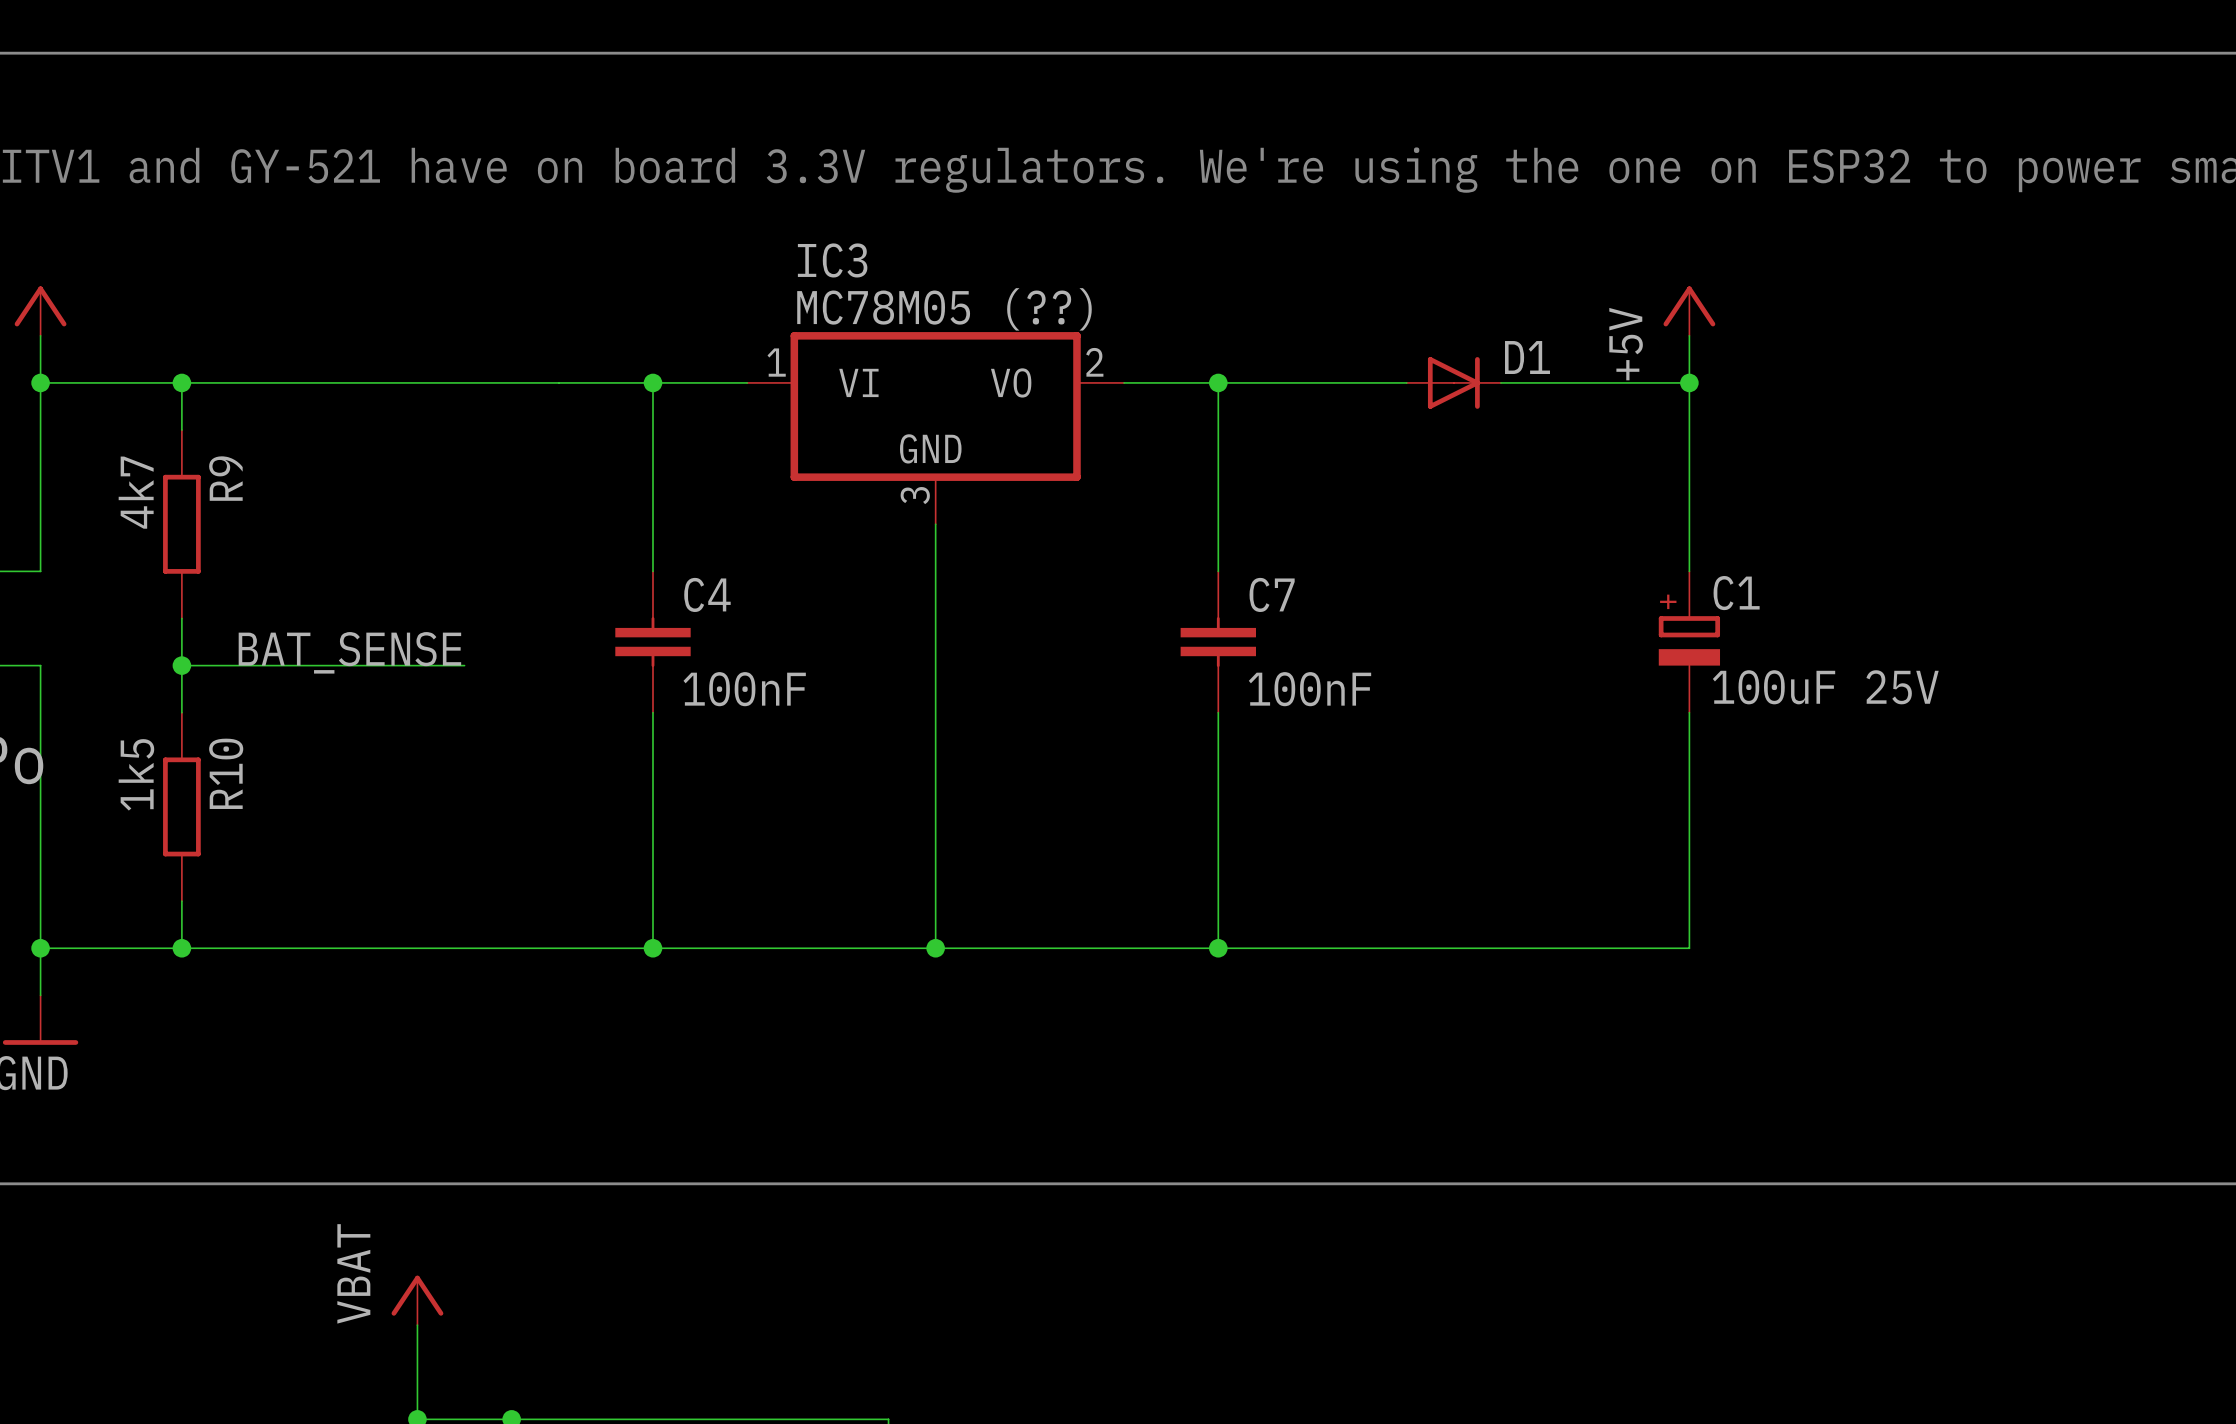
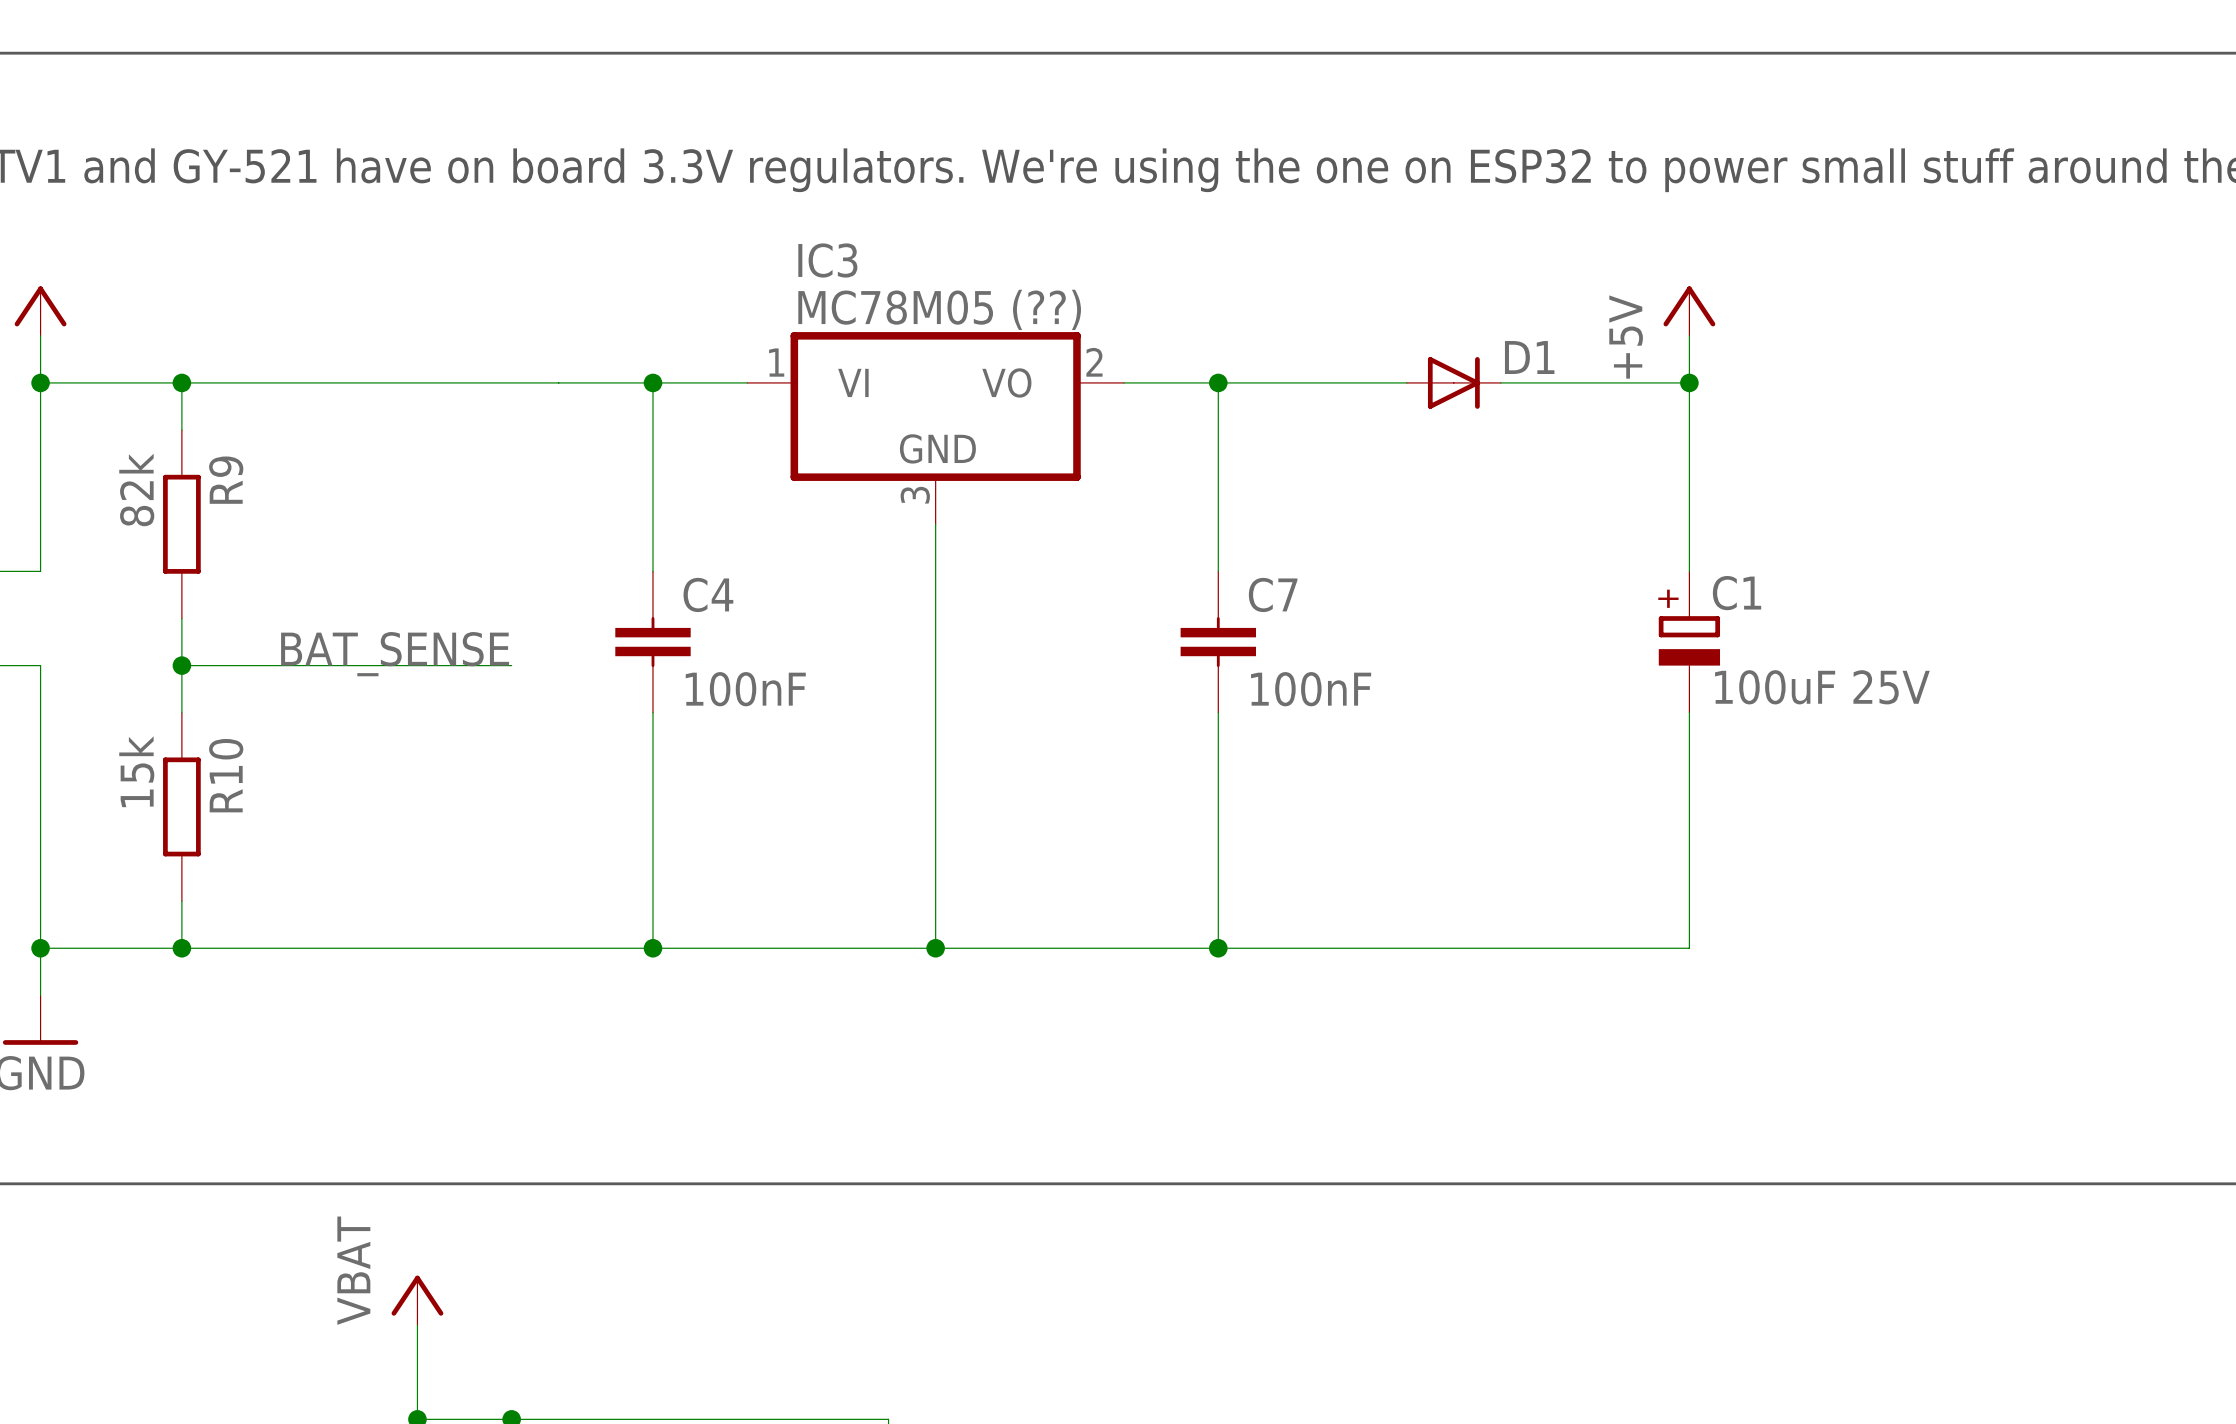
R9 value: 4k7 (136, 492) -> 82k (136, 489)
label position: BAT_SENSE (349, 652) -> BAT_SENSE (395, 654)
wire: none -> (464, 665) (511, 665)
R10 value: 1k5 (136, 774) -> 15k (136, 771)

